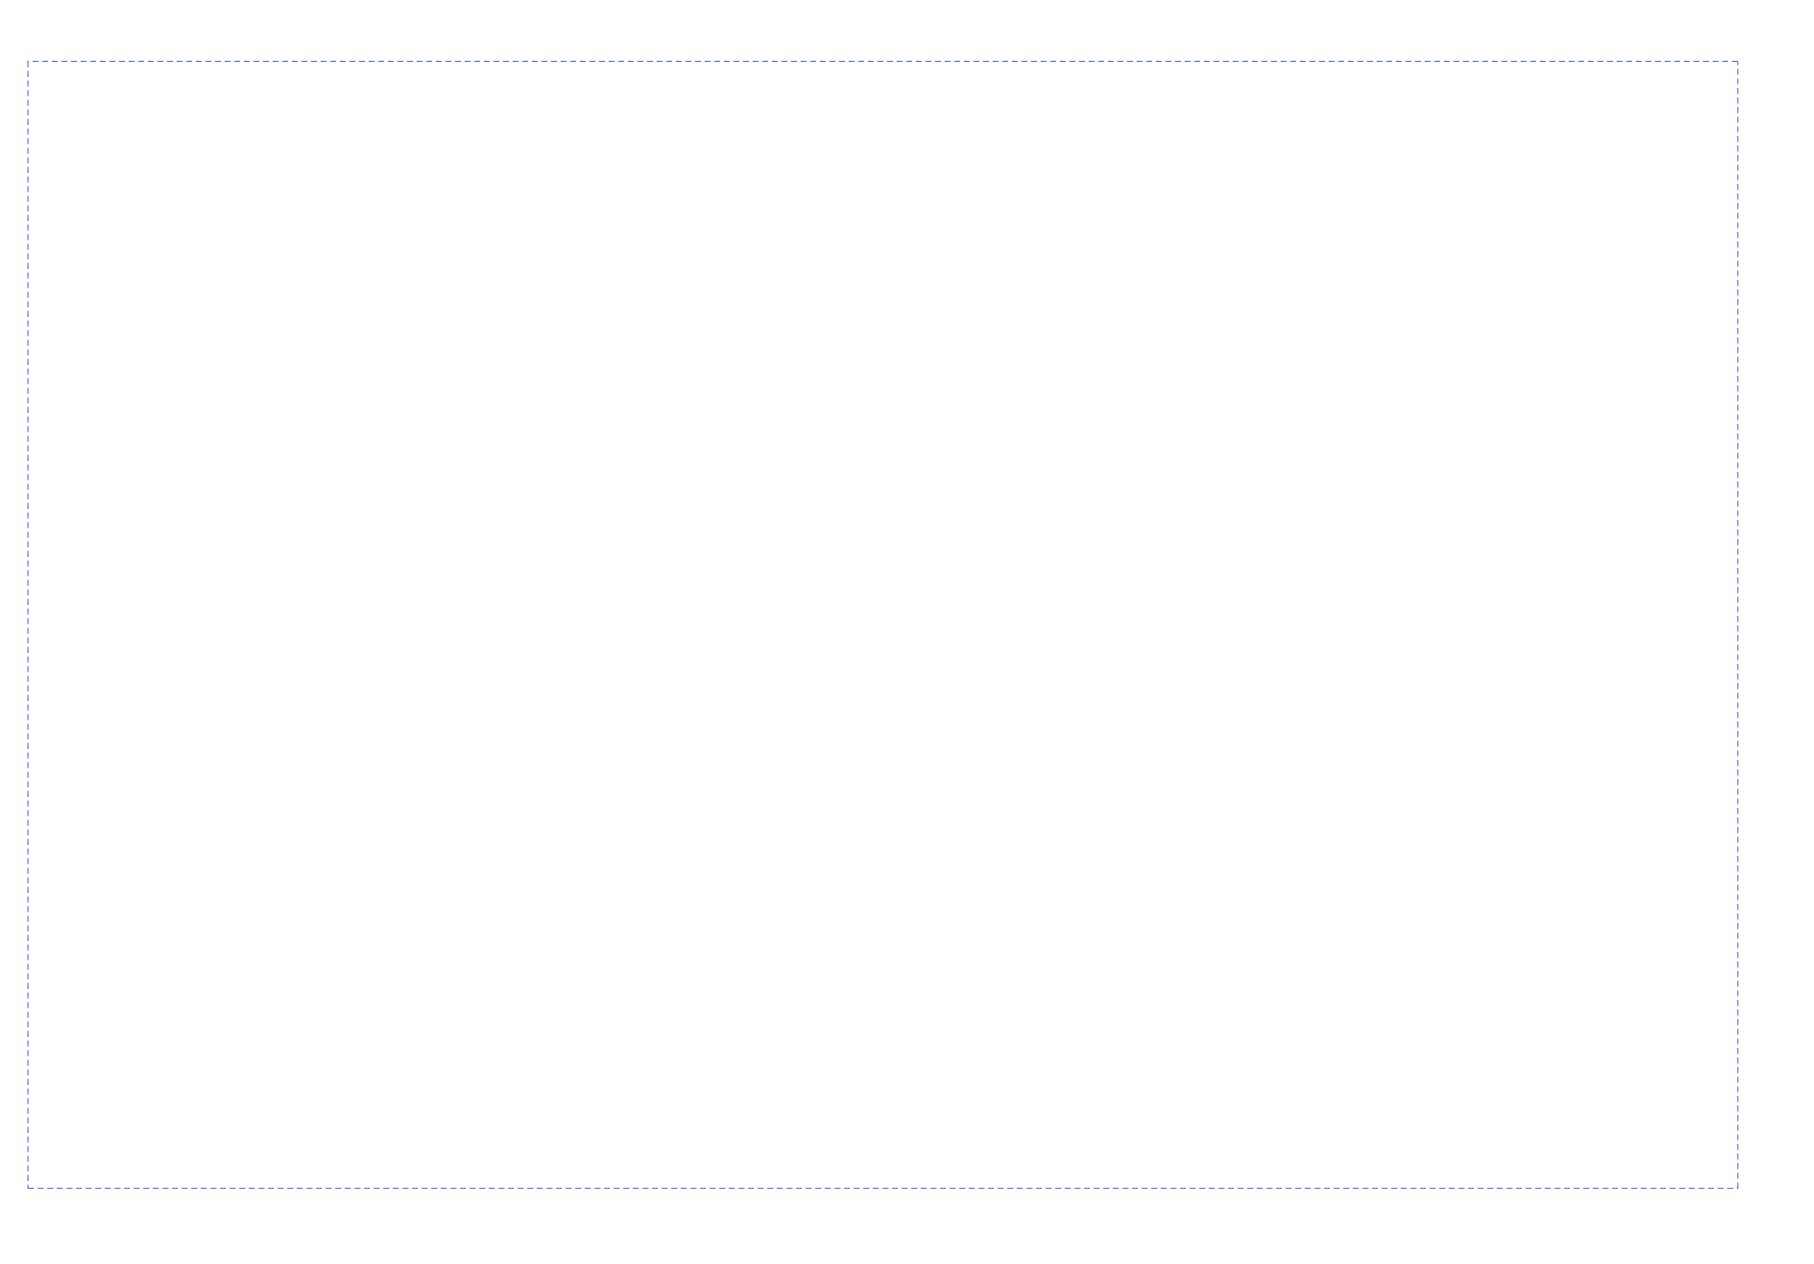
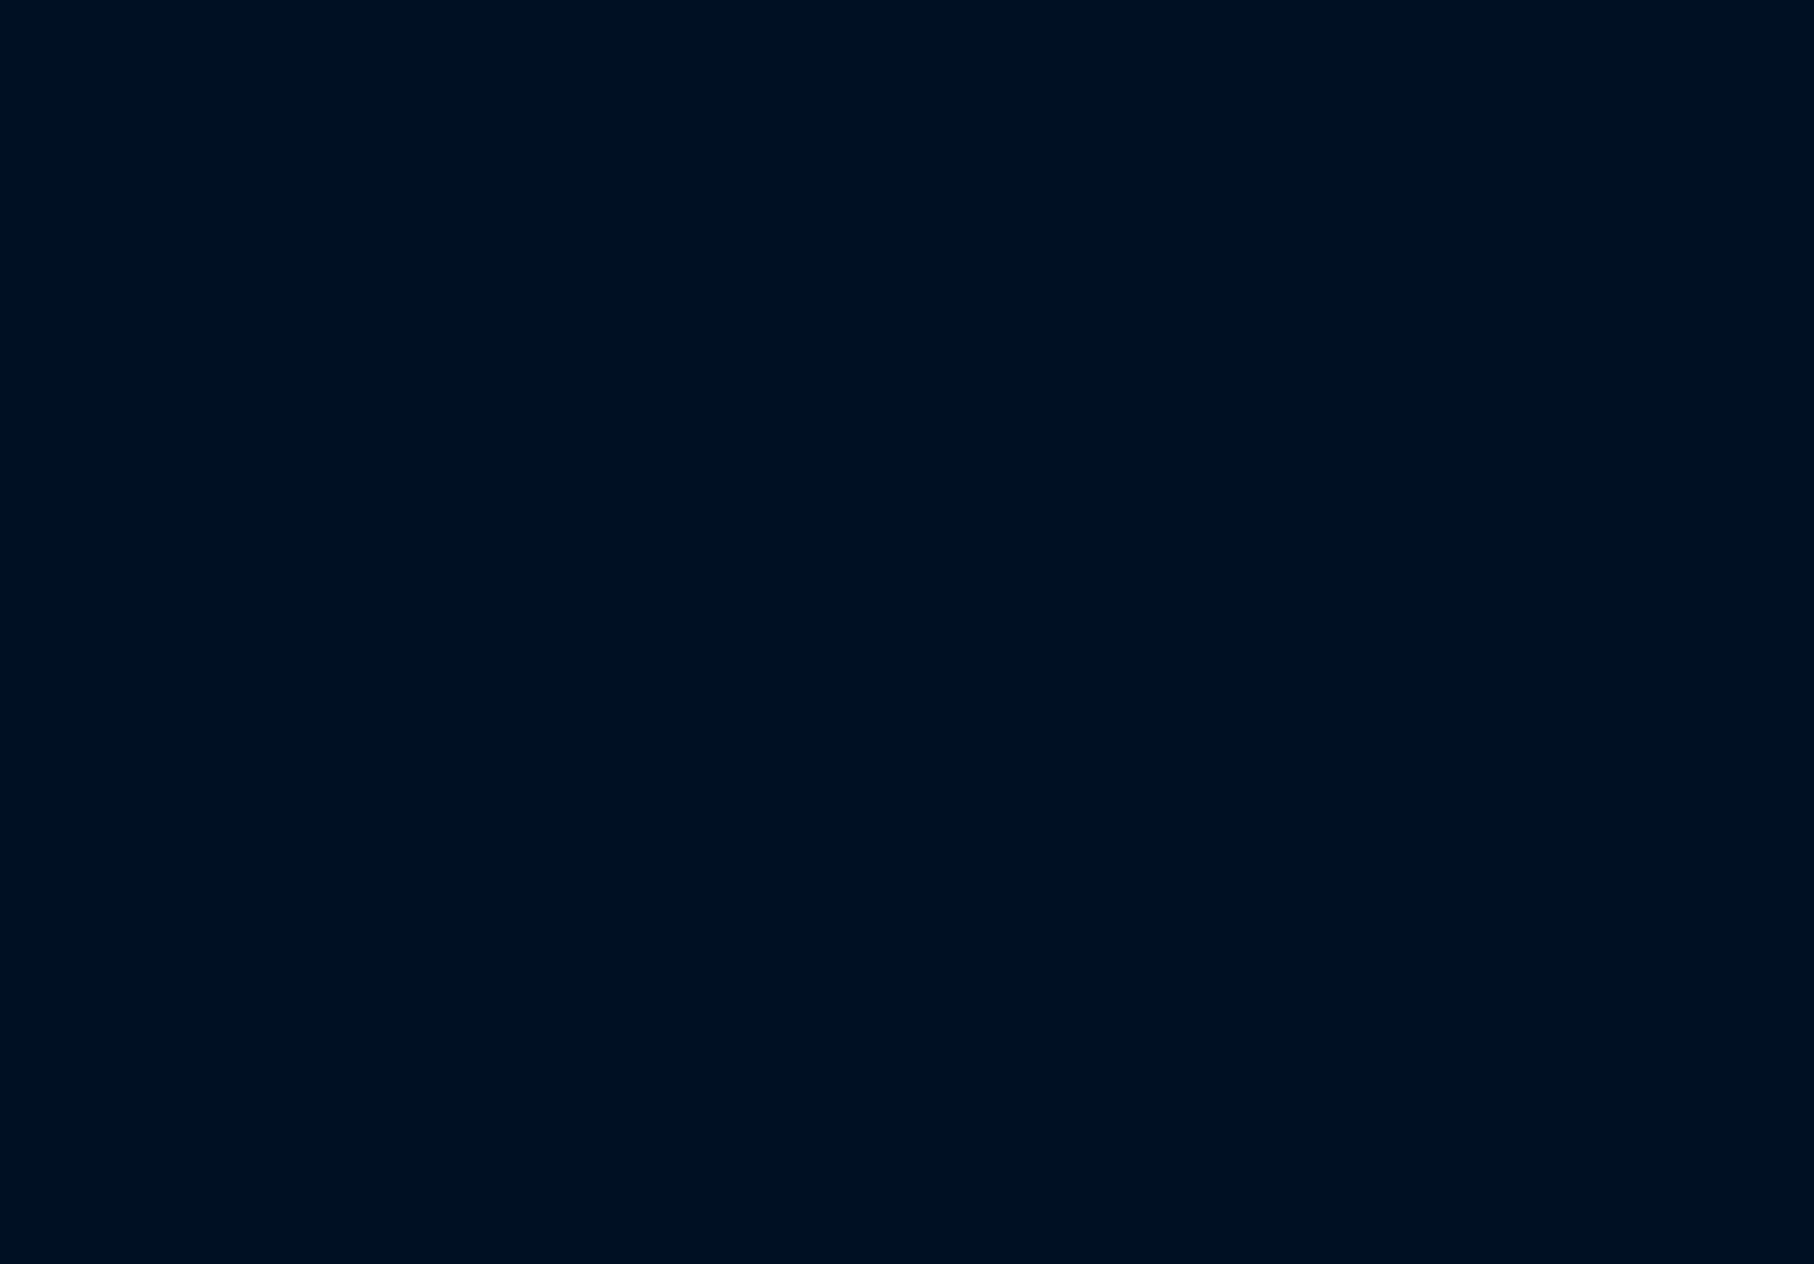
zone outline: (1737, 61) (27, 61) (27, 1188) (1737, 1188) (1737, 61) -> none

